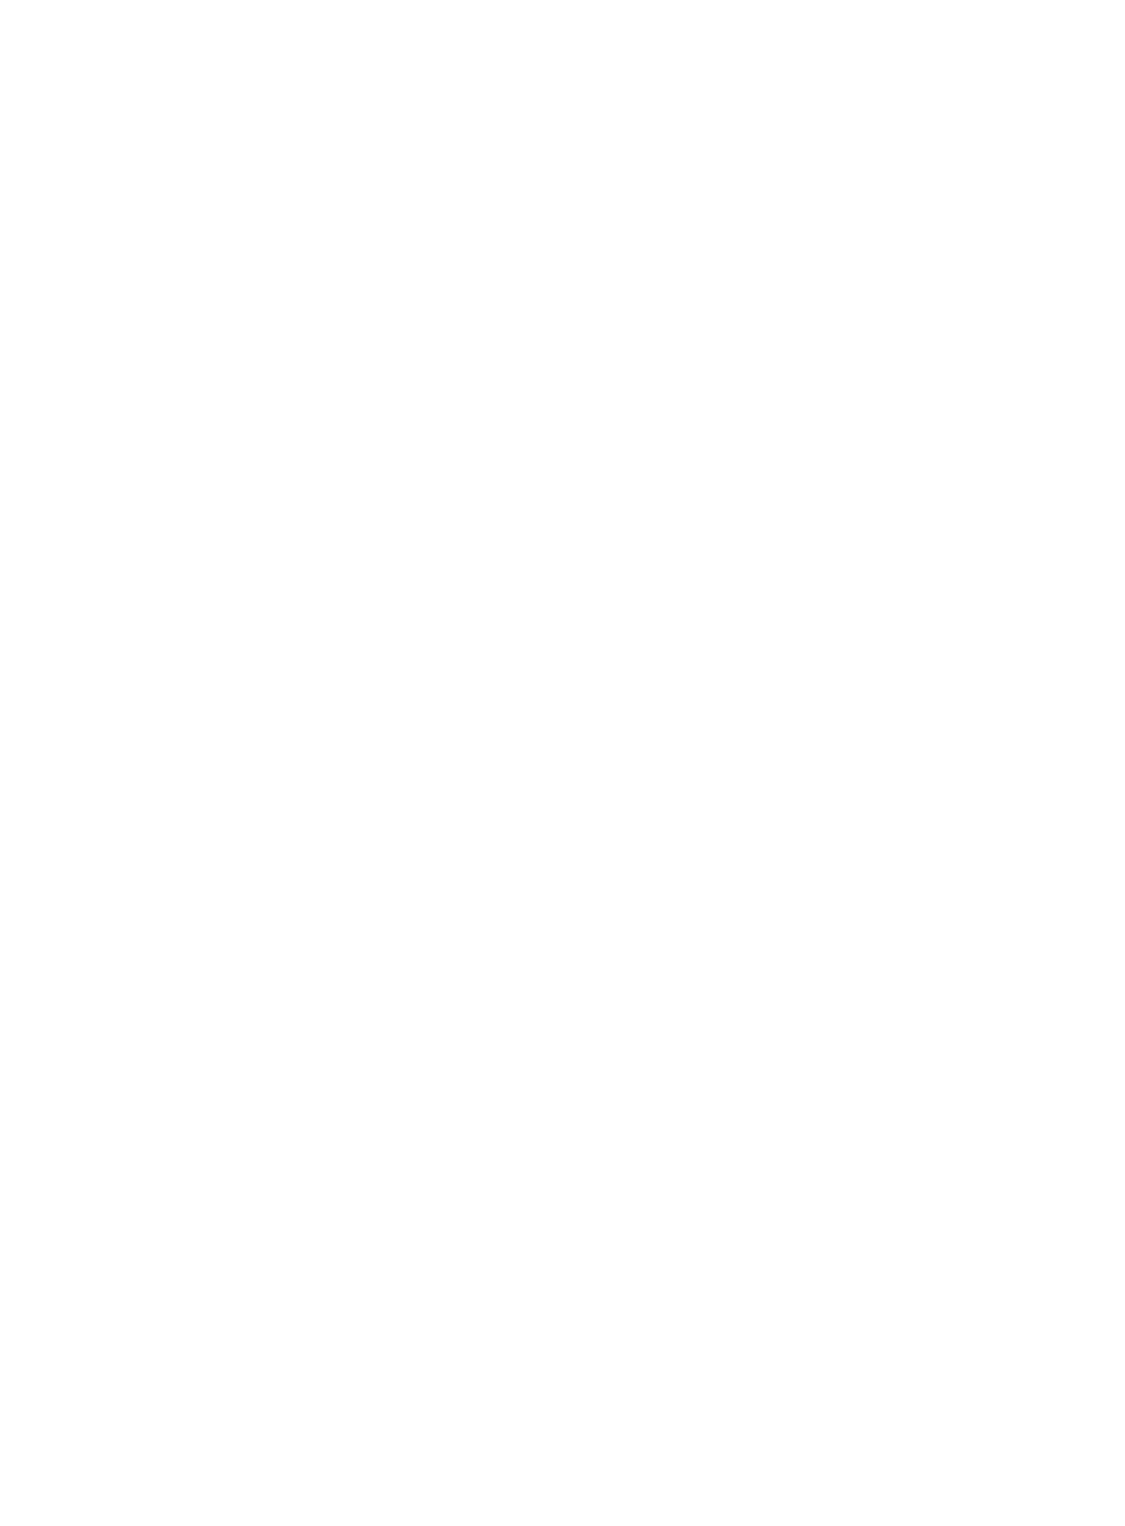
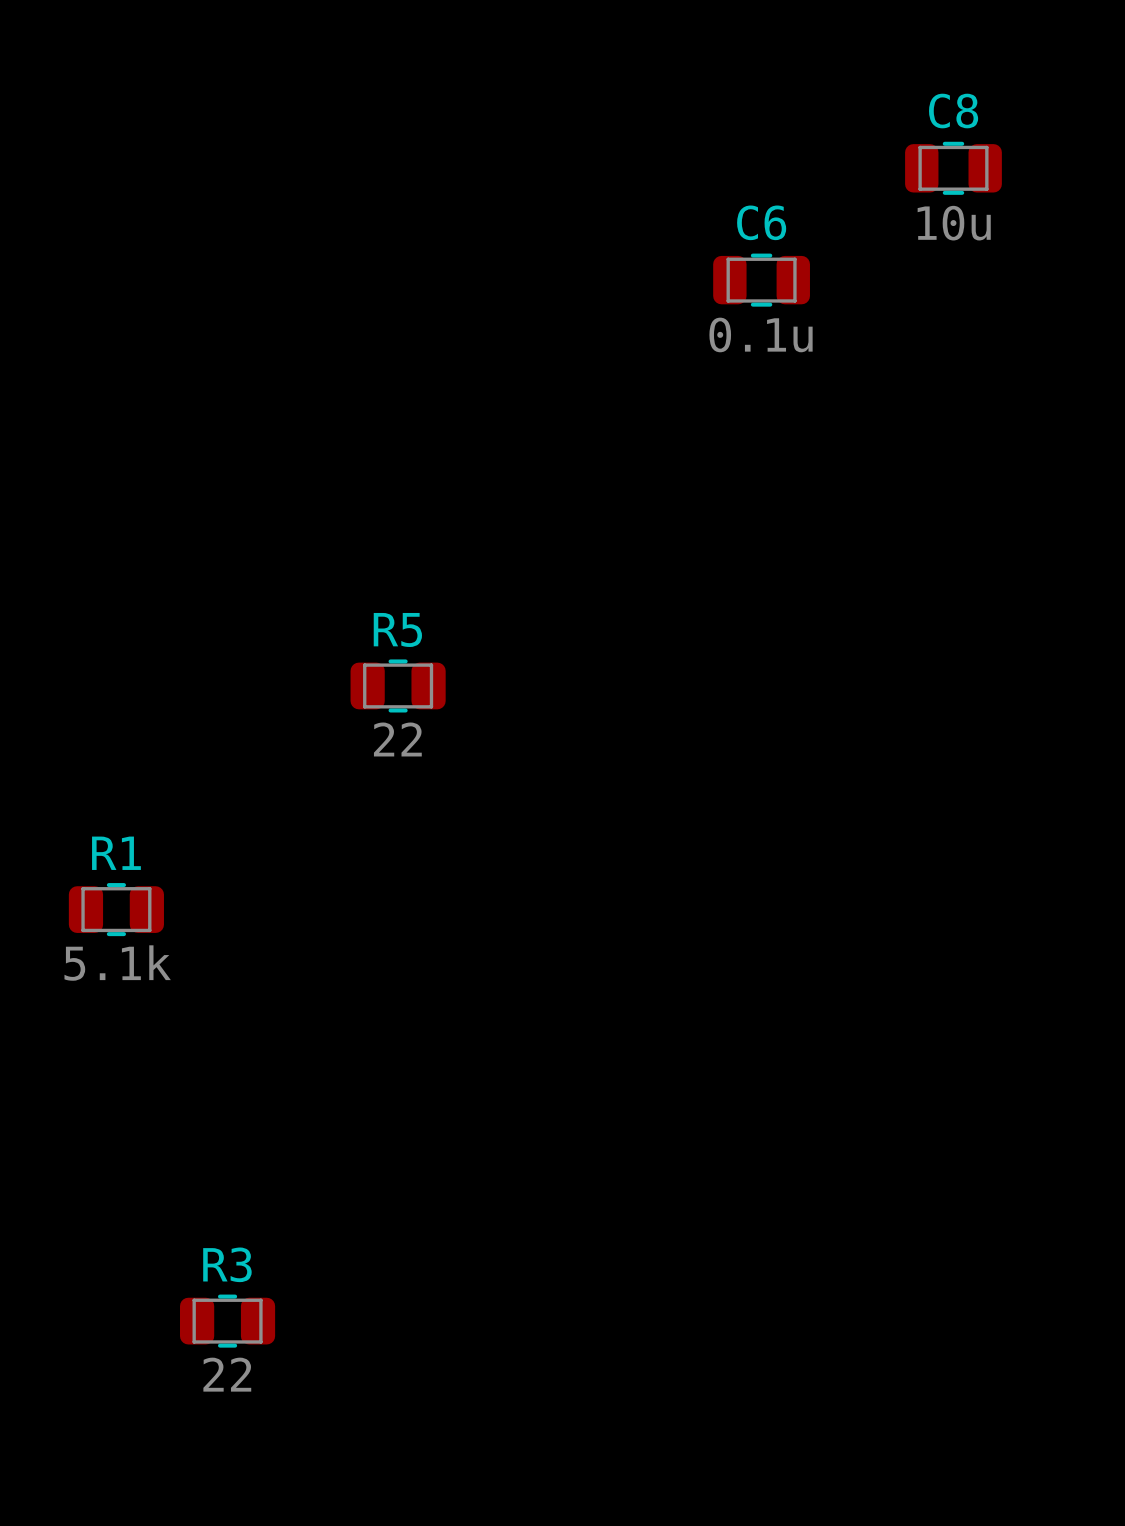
C8: none -> 10u (953, 168)
C6: none -> 0.1u (761, 280)
R5: none -> 22 (398, 685)
R1: none -> 5.1k (116, 909)
R3: none -> 22 (227, 1321)

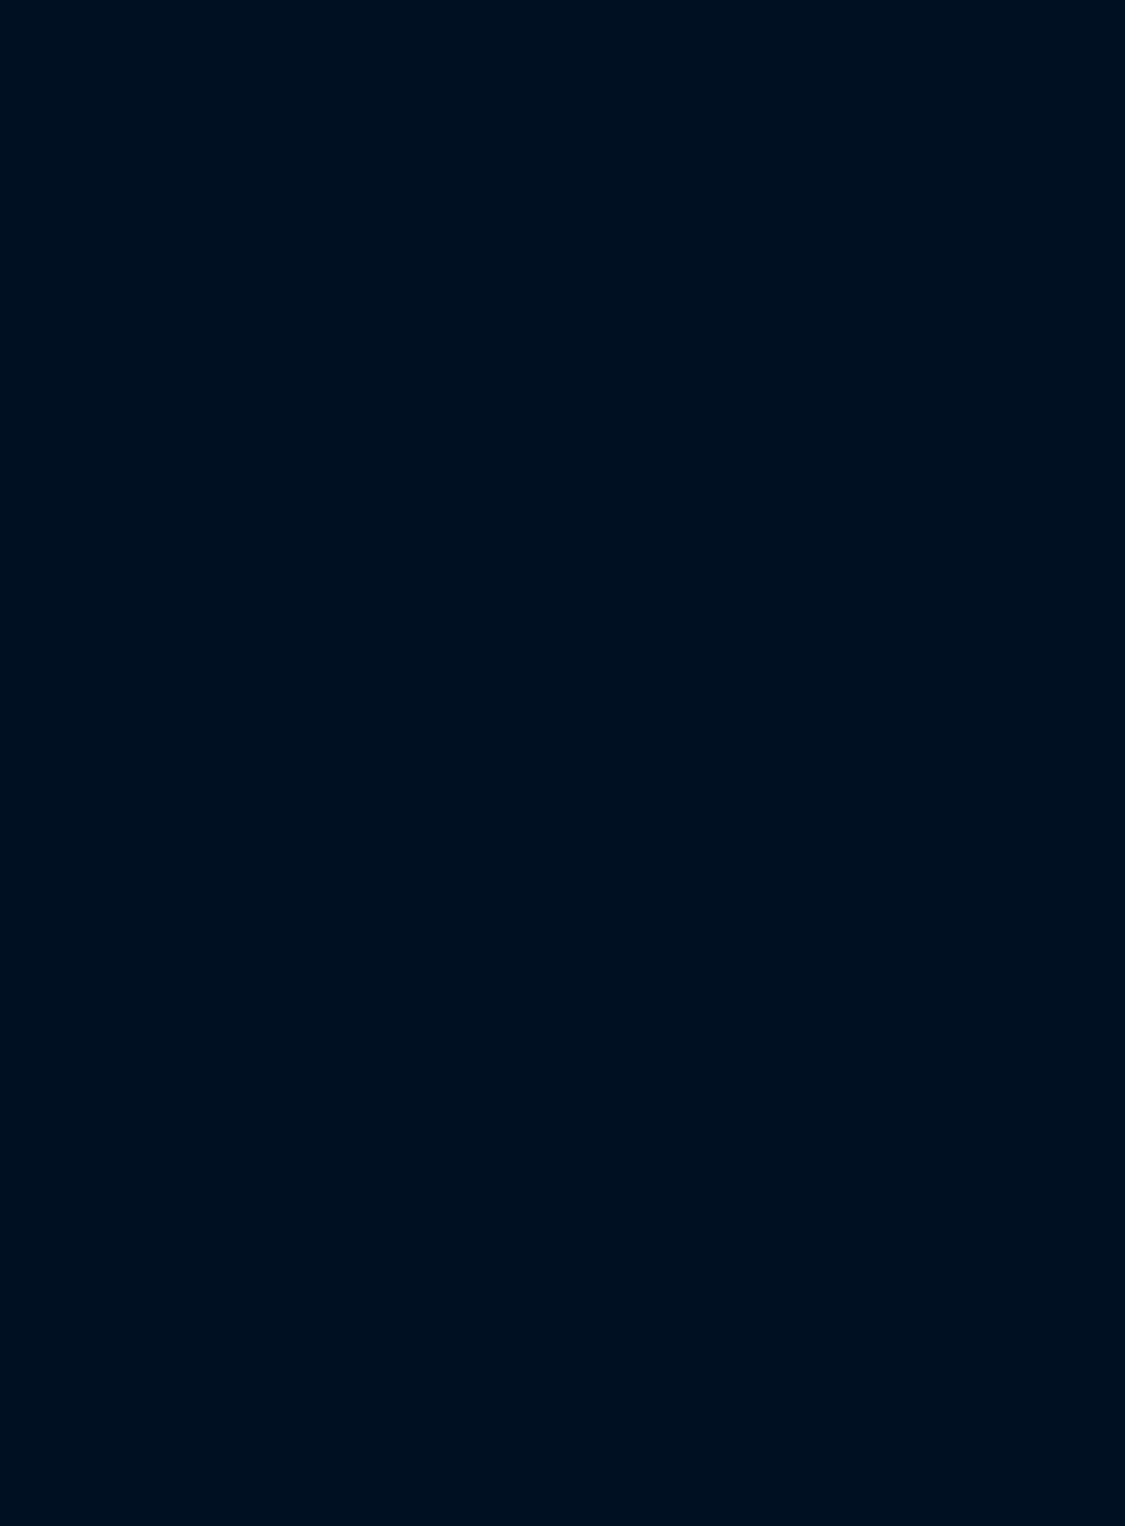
C8: 10u (953, 168) -> none
C6: 0.1u (761, 280) -> none
R5: 22 (398, 685) -> none
R1: 5.1k (116, 909) -> none
R3: 22 (227, 1321) -> none

